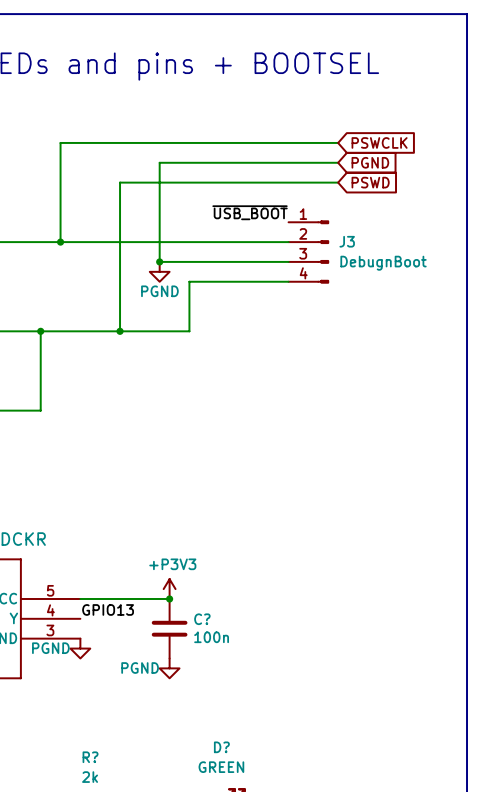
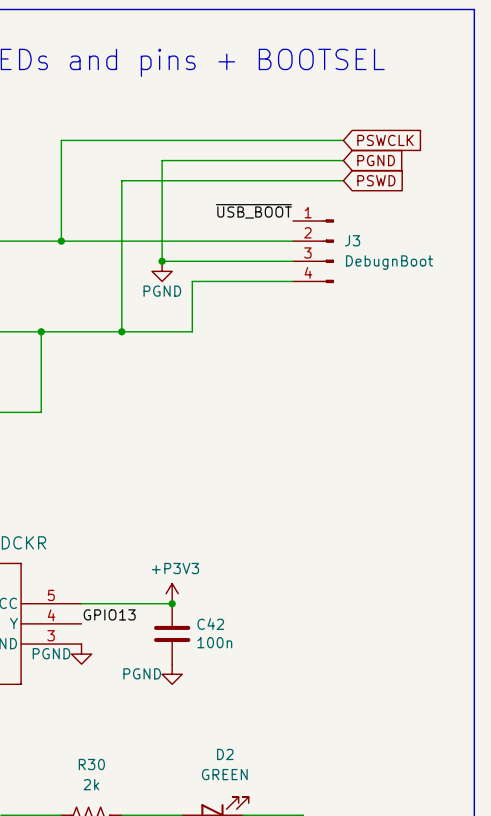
C? name: C? (202, 619) -> C42 (210, 624)
D? name: D? (221, 747) -> D2 (225, 754)
R? name: R? (90, 757) -> R30 (91, 764)

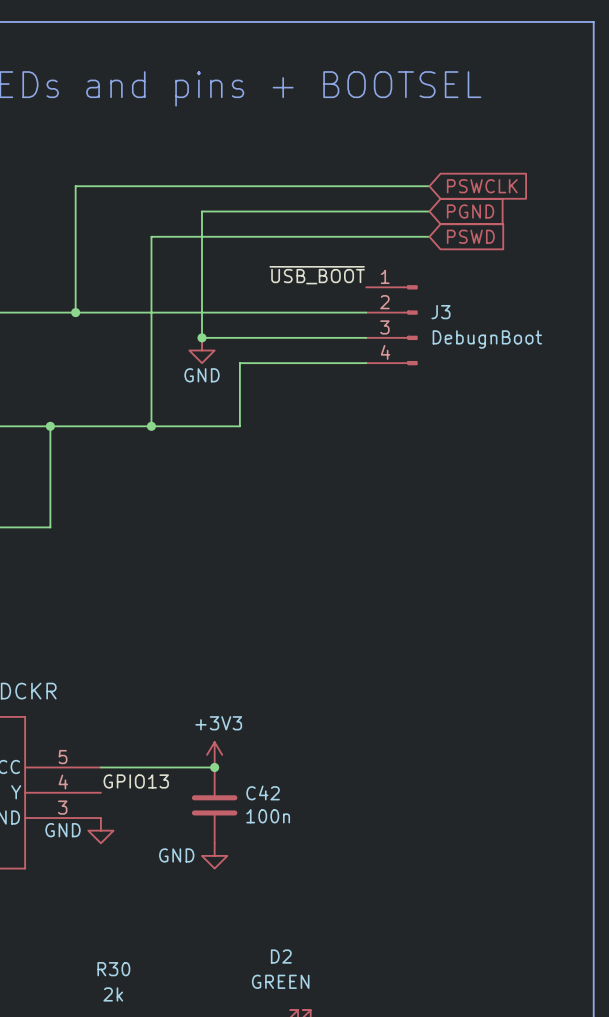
power symbol: PGND (162, 271) -> GND (202, 350)
power symbol: +P3V3 (172, 593) -> +3V3 (214, 754)
power symbol: PGND (81, 654) -> GND (100, 830)
power symbol: PGND (172, 674) -> GND (214, 855)

